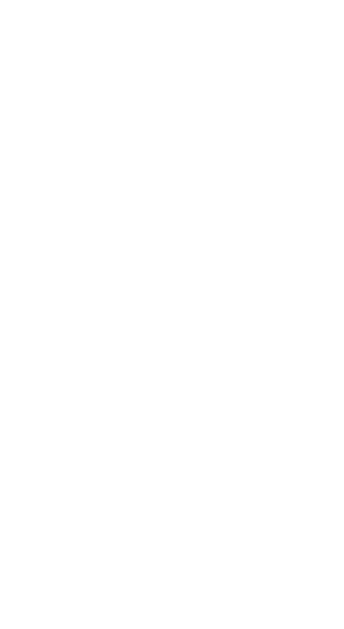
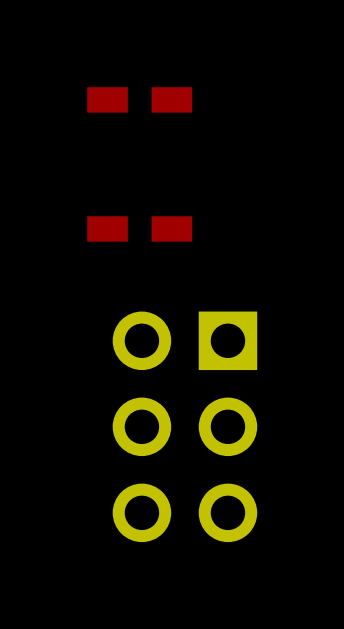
part: none -> (139, 99)
part: none -> (139, 228)
part: none -> (184, 426)

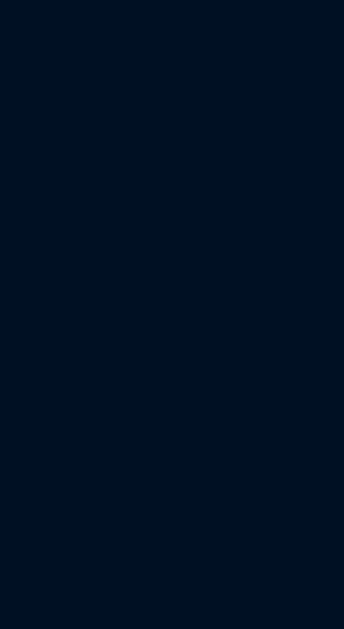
part: (139, 99) -> none
part: (139, 228) -> none
part: (184, 426) -> none

